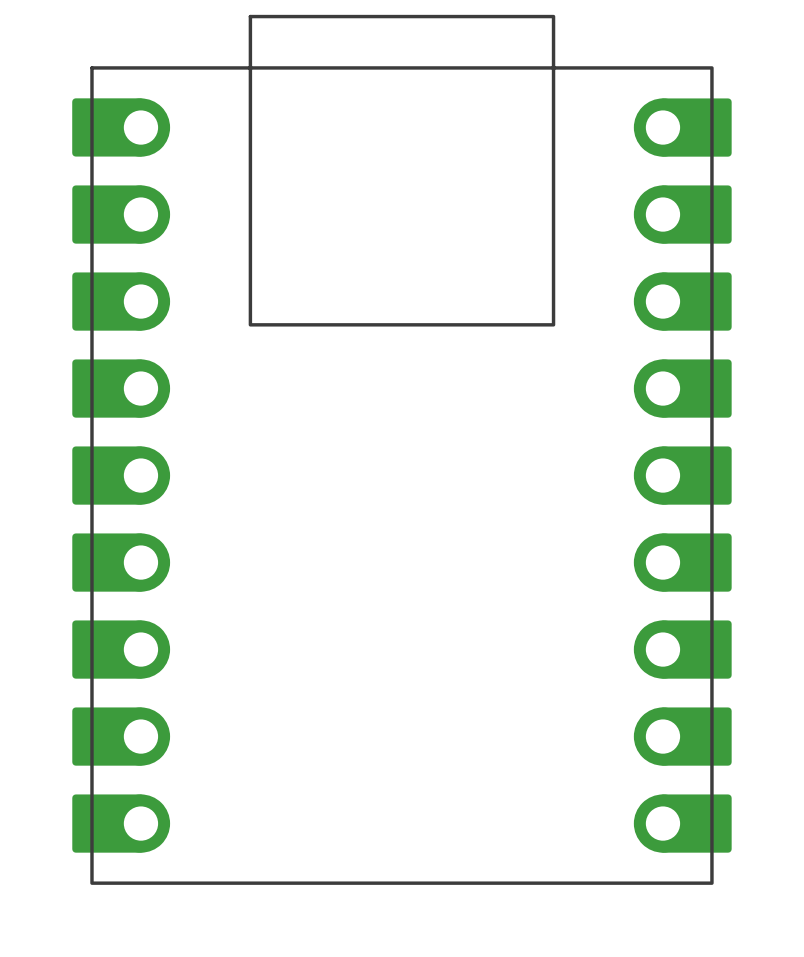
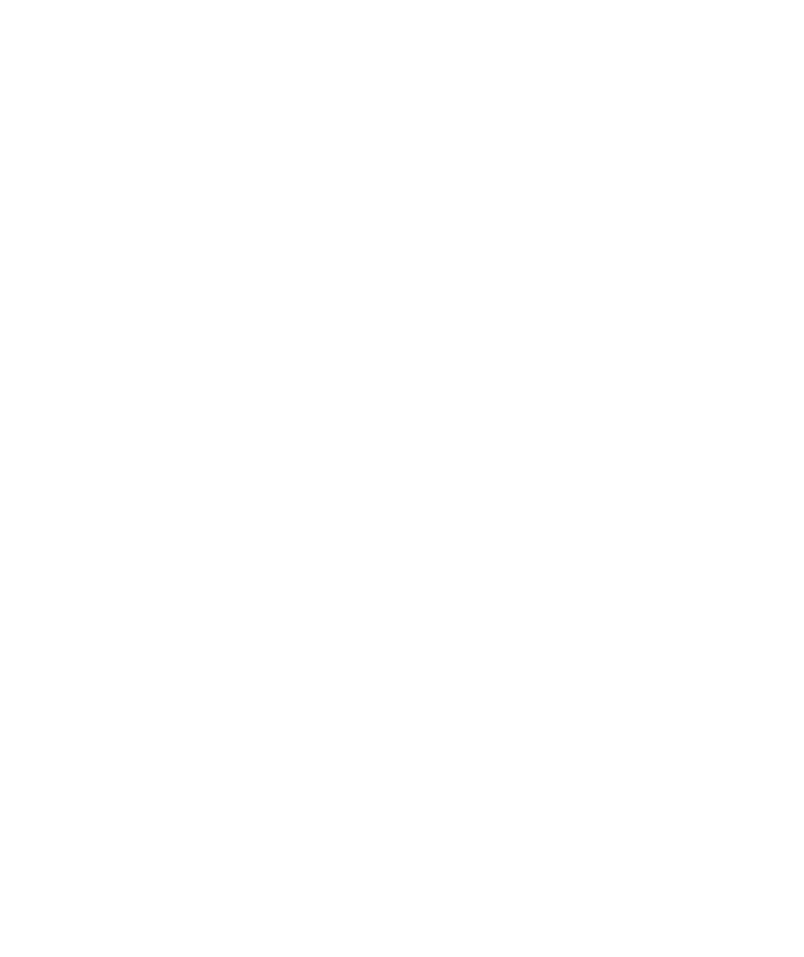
part: (401, 449) -> none

